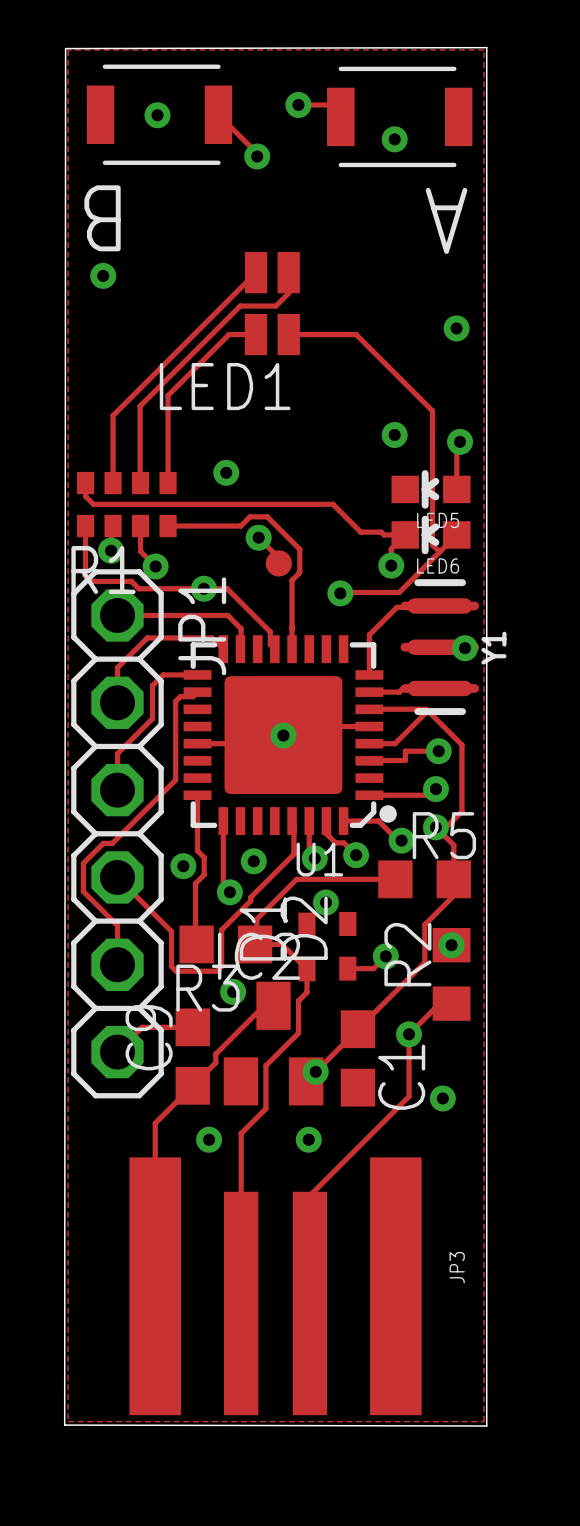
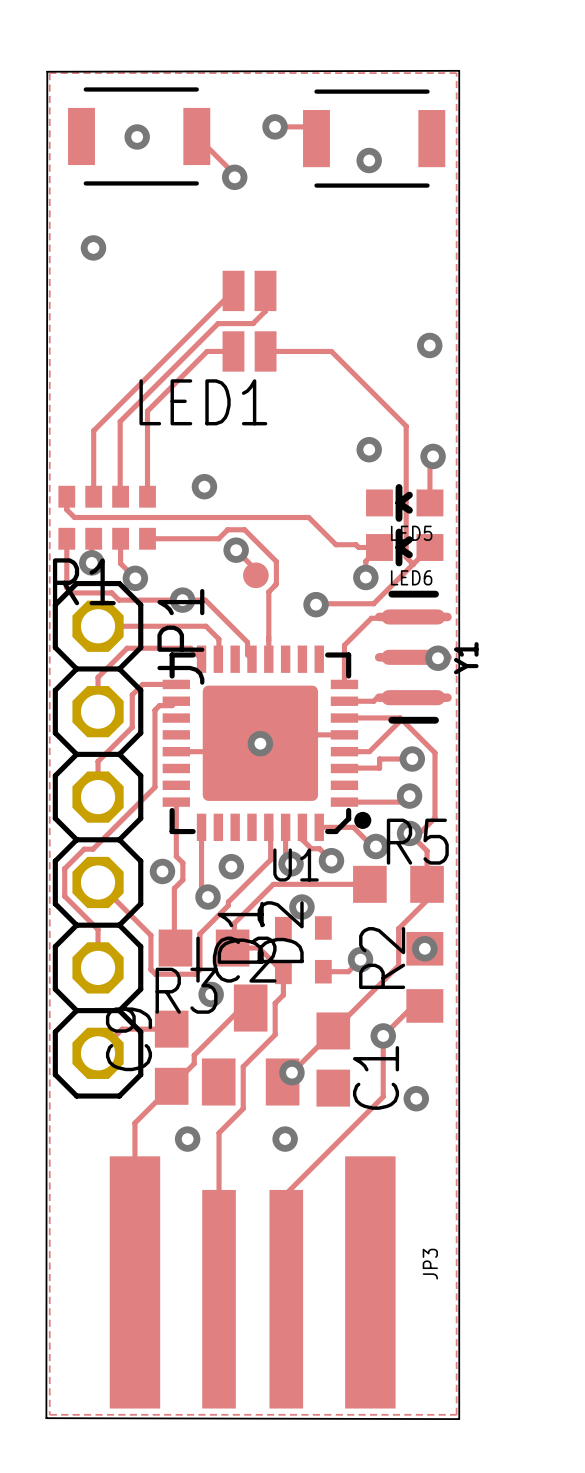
text: B (102, 218) -> none
text: A (446, 220) -> none
via position: (103, 275) -> (93, 247)

